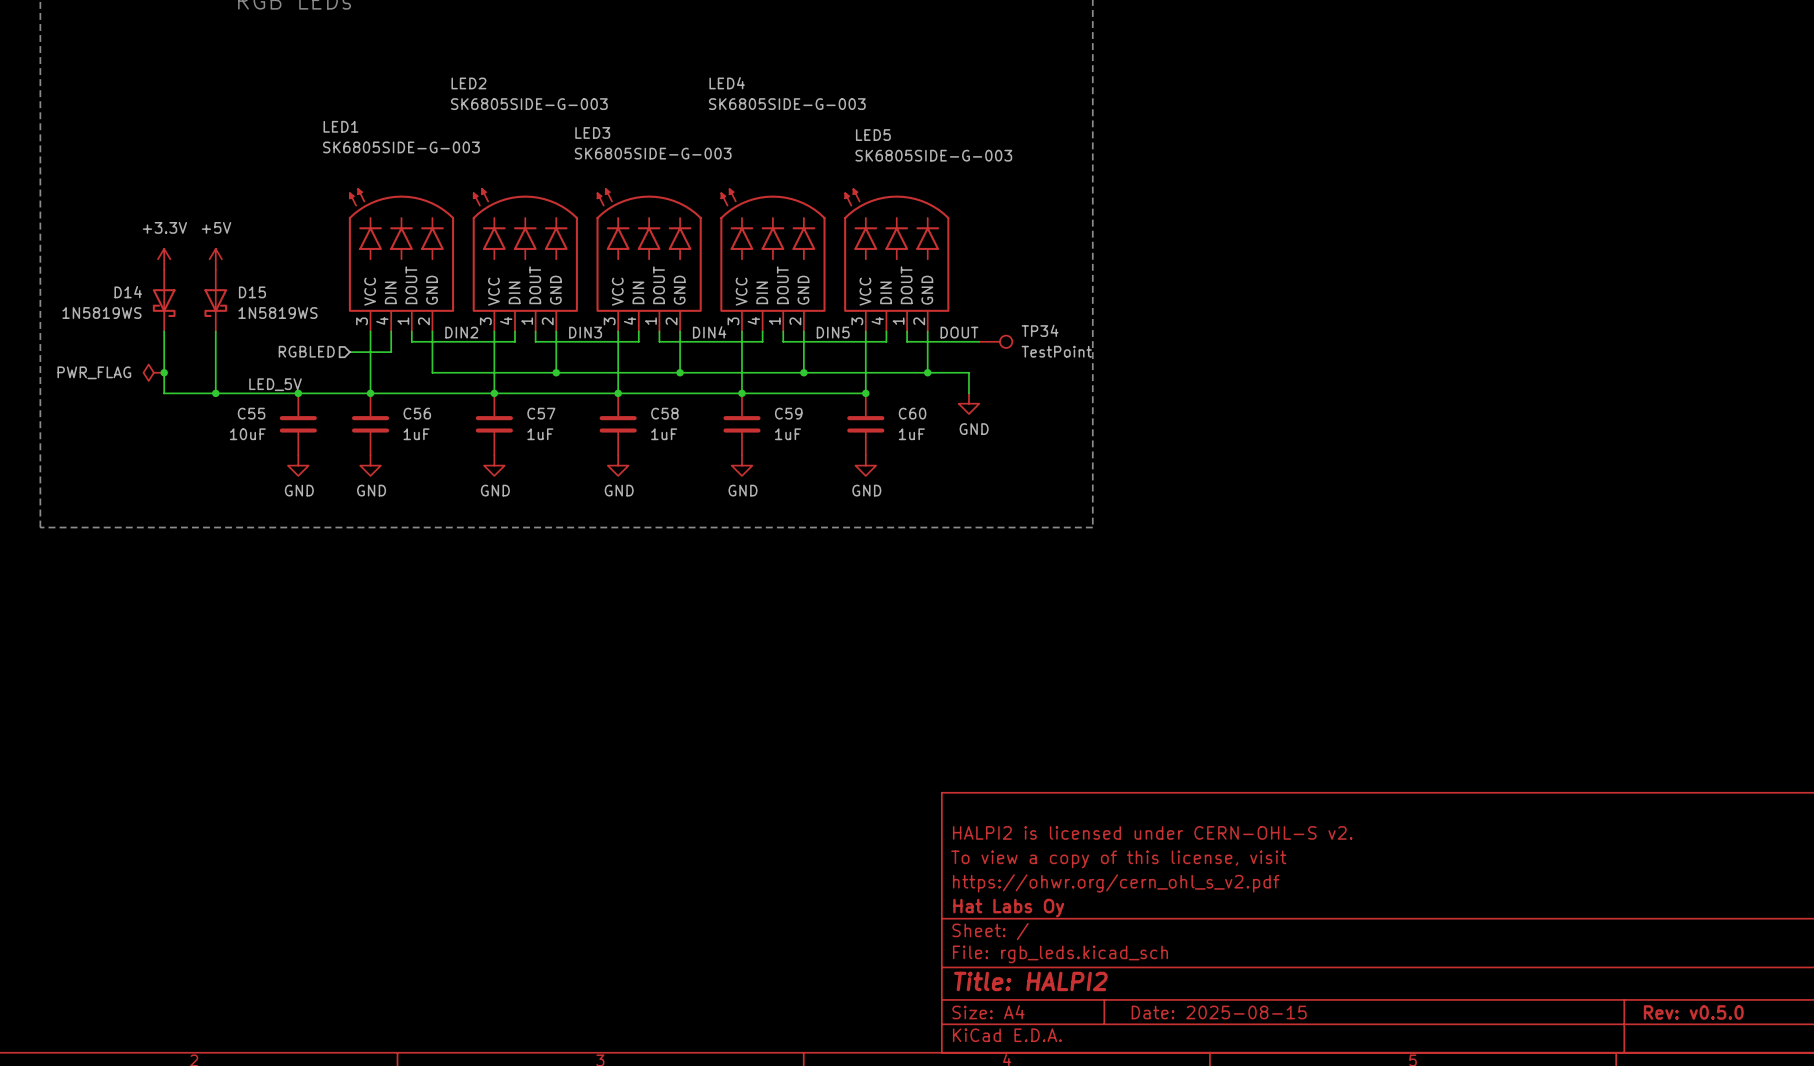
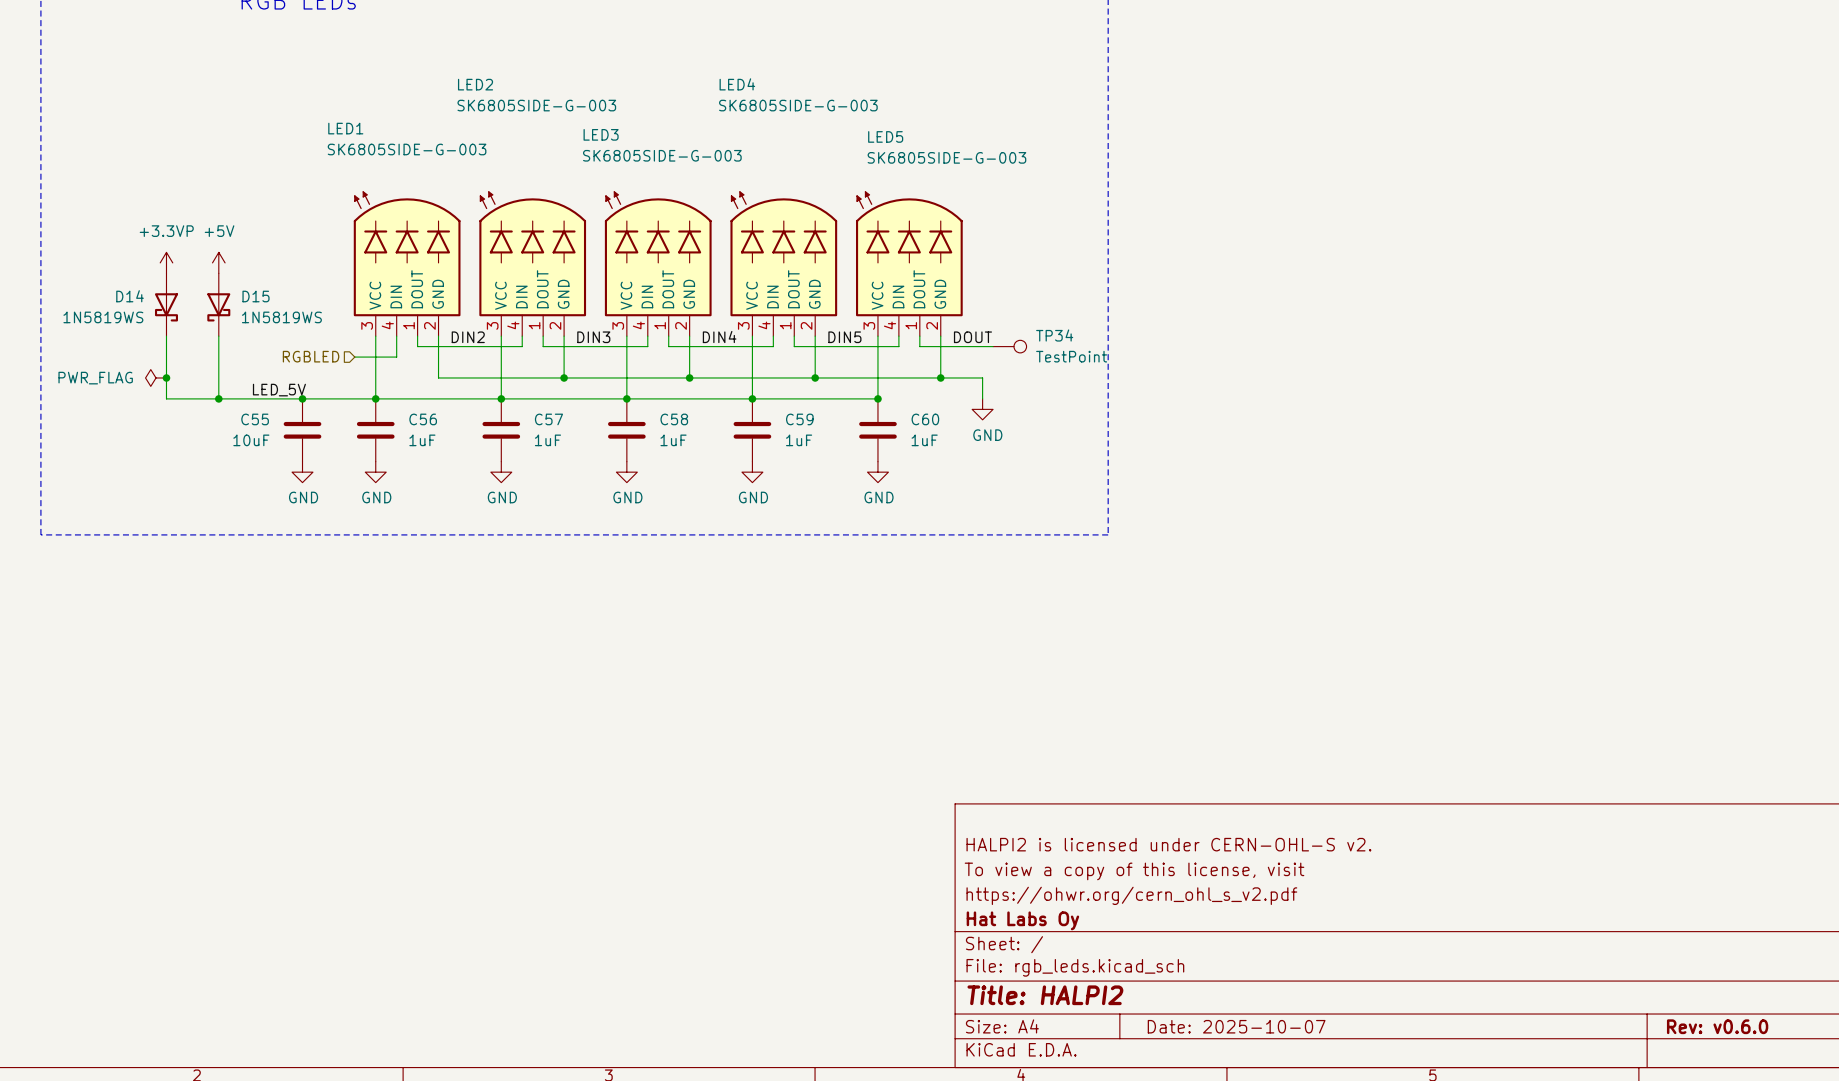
power symbol: +3.3V (164, 259) -> +3.3VP (166, 262)
title block: Date: 2025-08-15 (1219, 1012) -> Date: 2025-10-07 (1236, 1026)
title block: Rev: v0.5.0 (1693, 1012) -> Rev: v0.6.0 (1717, 1026)

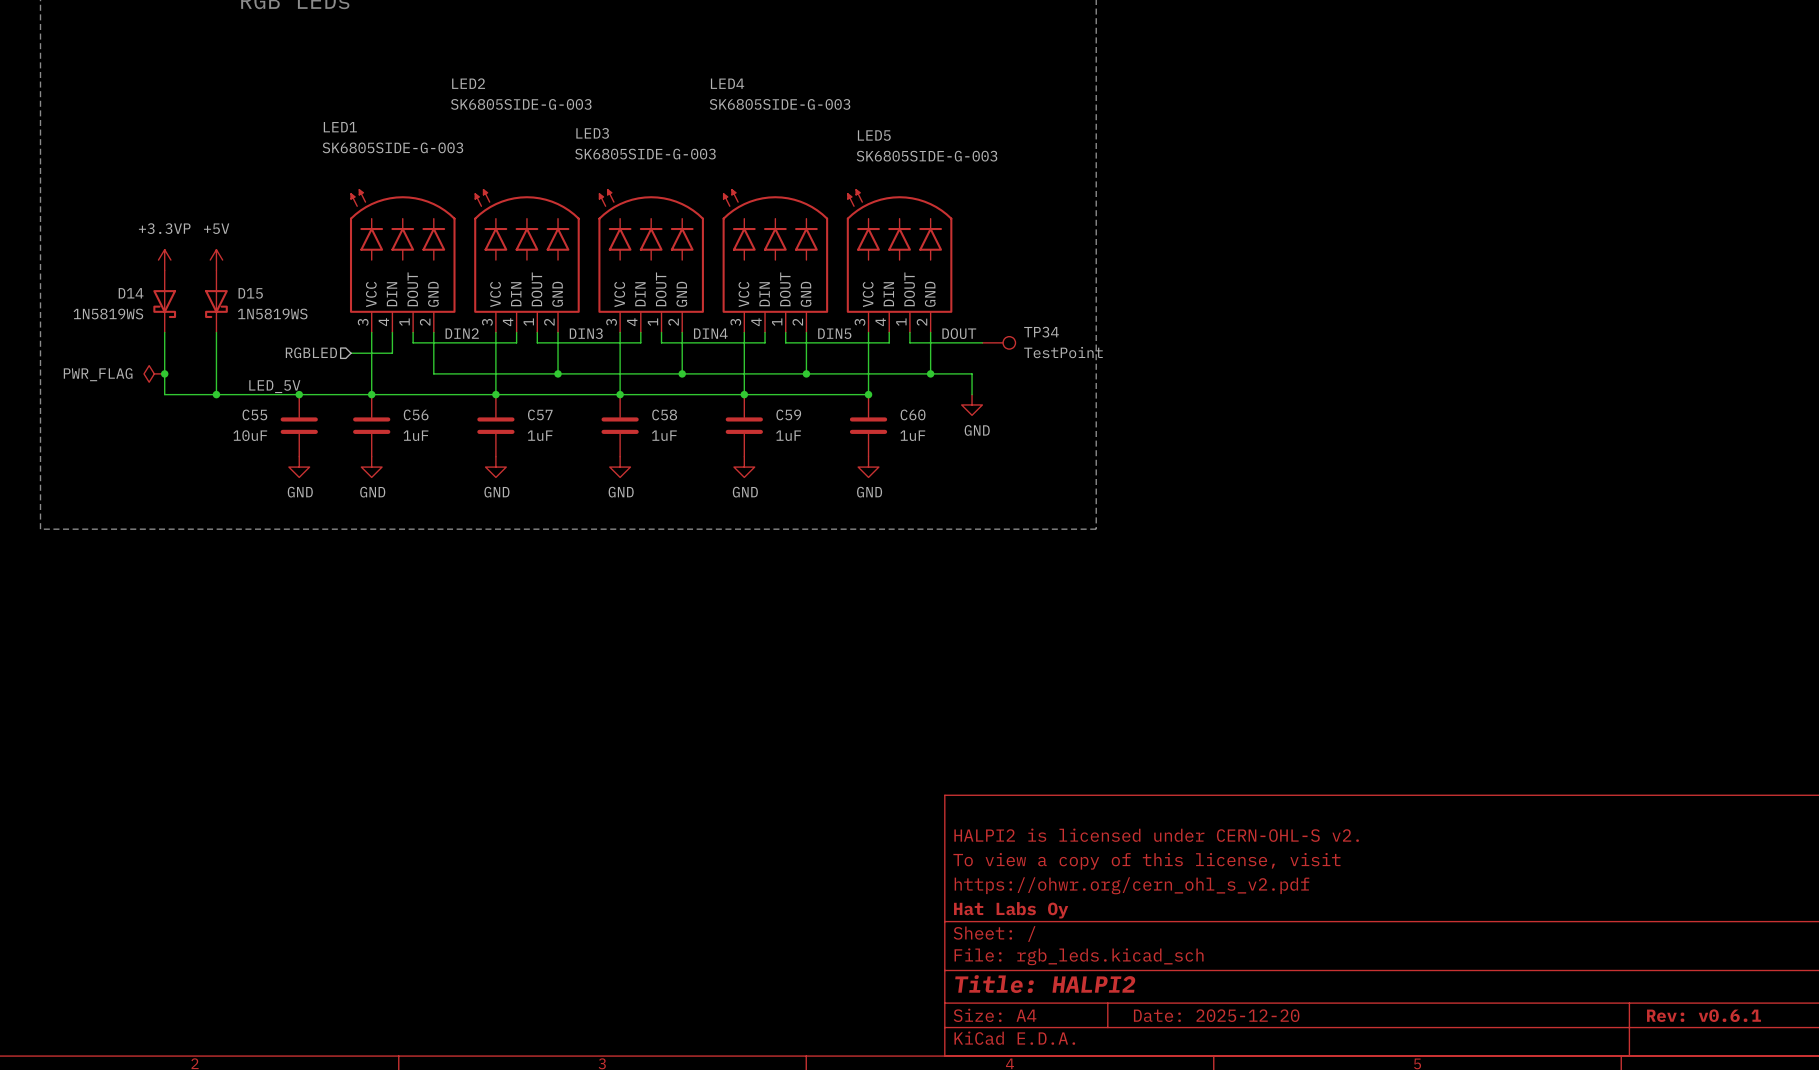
title block: Date: 2025-10-07 (1236, 1026) -> Date: 2025-12-20 (1216, 1015)
title block: Rev: v0.6.0 (1717, 1026) -> Rev: v0.6.1 (1703, 1015)

